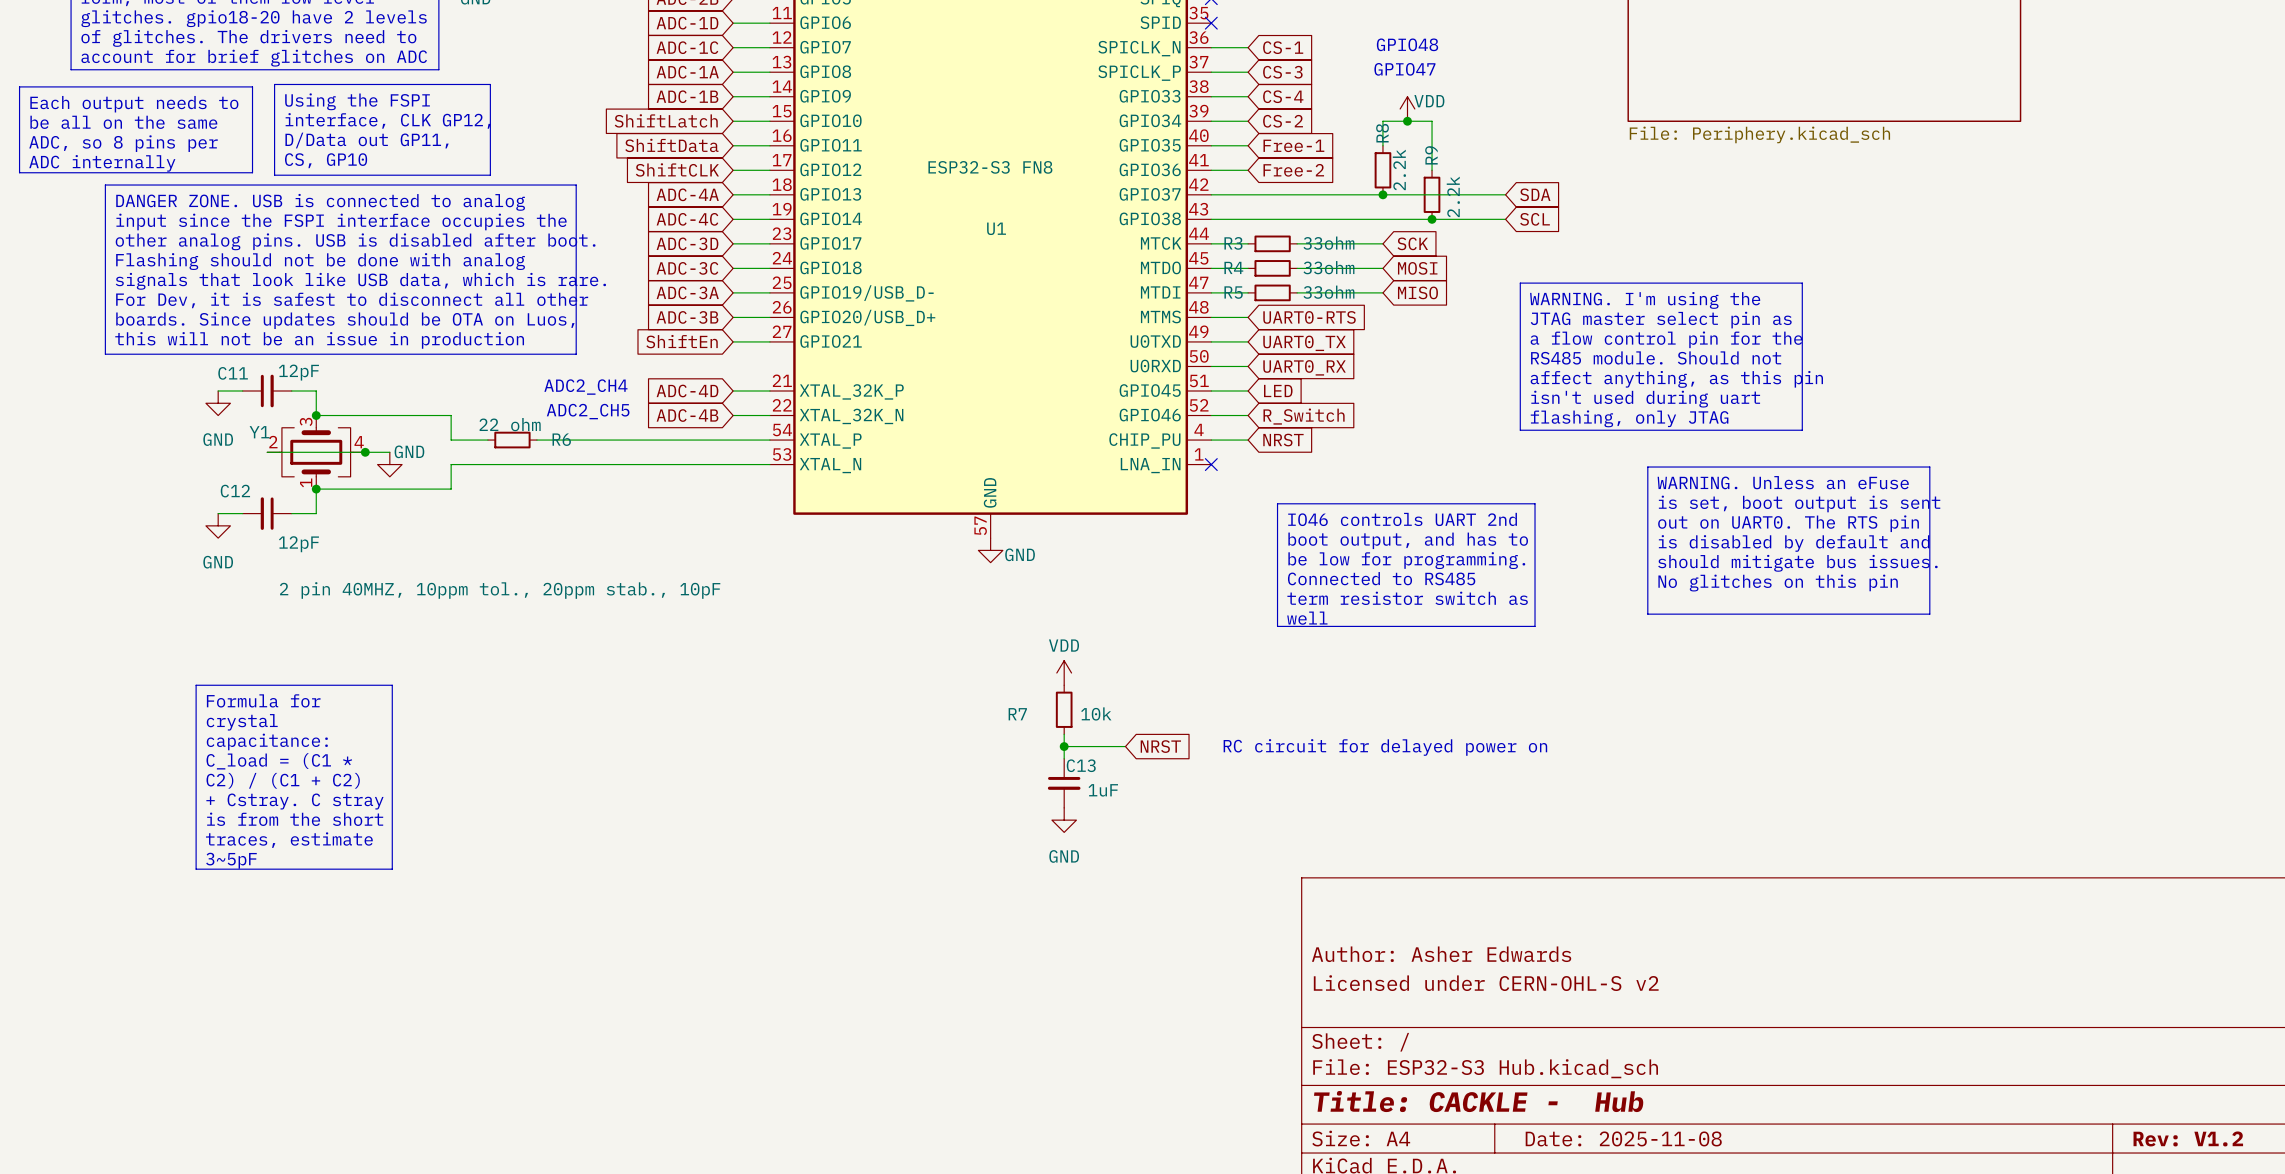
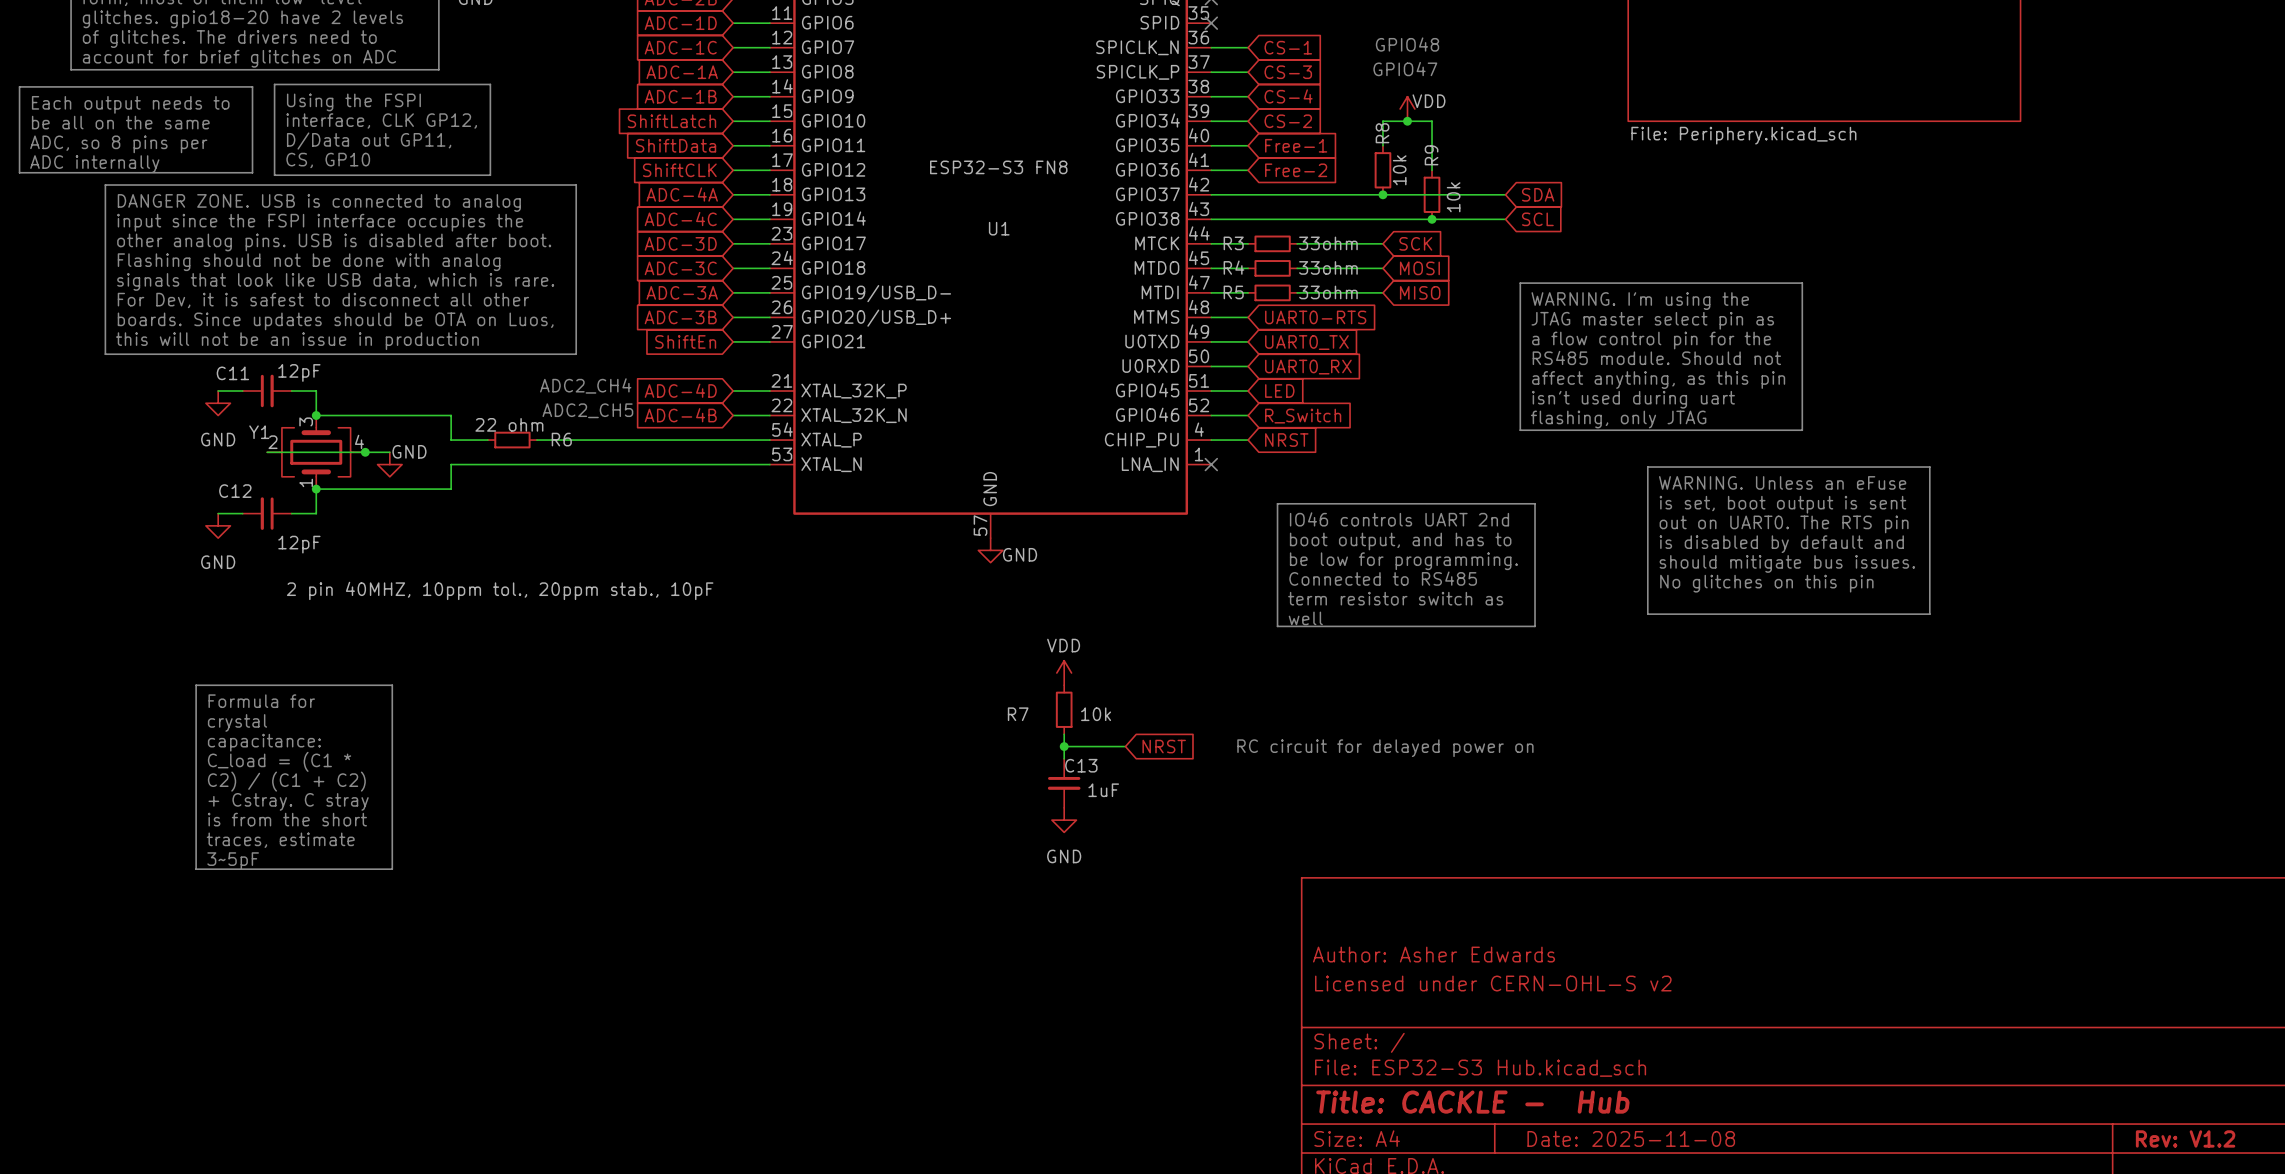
R8 value: 2.2k (1399, 169) -> 10k (1399, 170)
R9 value: 2.2k (1453, 196) -> 10k (1453, 197)

